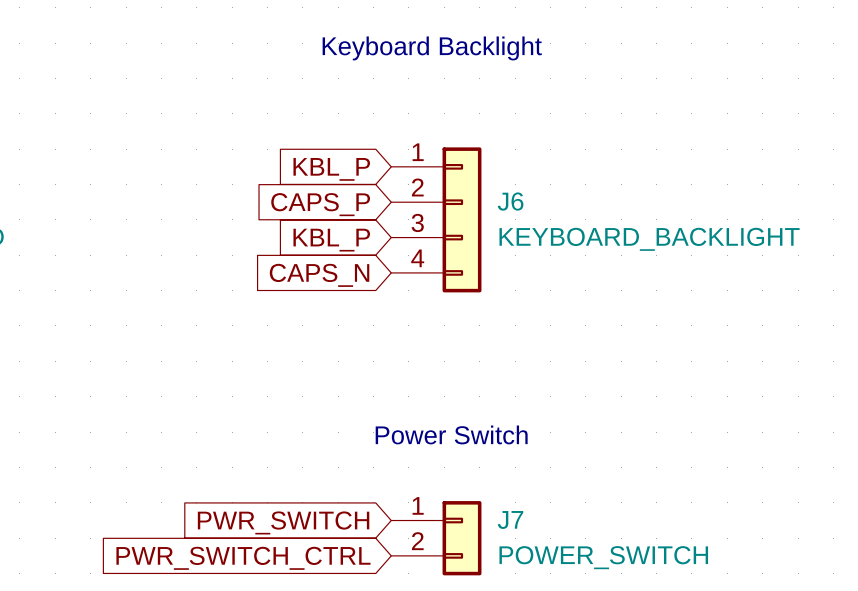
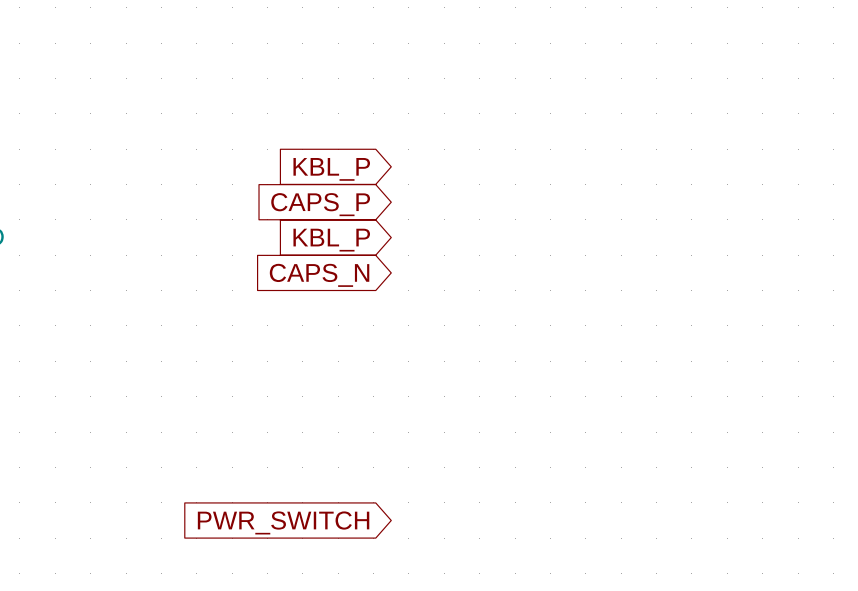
text: Keyboard Backlight (432, 48) -> none
J6: KEYBOARD_BACKLIGHT (436, 219) -> none
text: Power Switch (451, 434) -> none
J7: POWER_SWITCH (436, 538) -> none
global label: PWR_SWITCH_CTRL (243, 558) -> none

